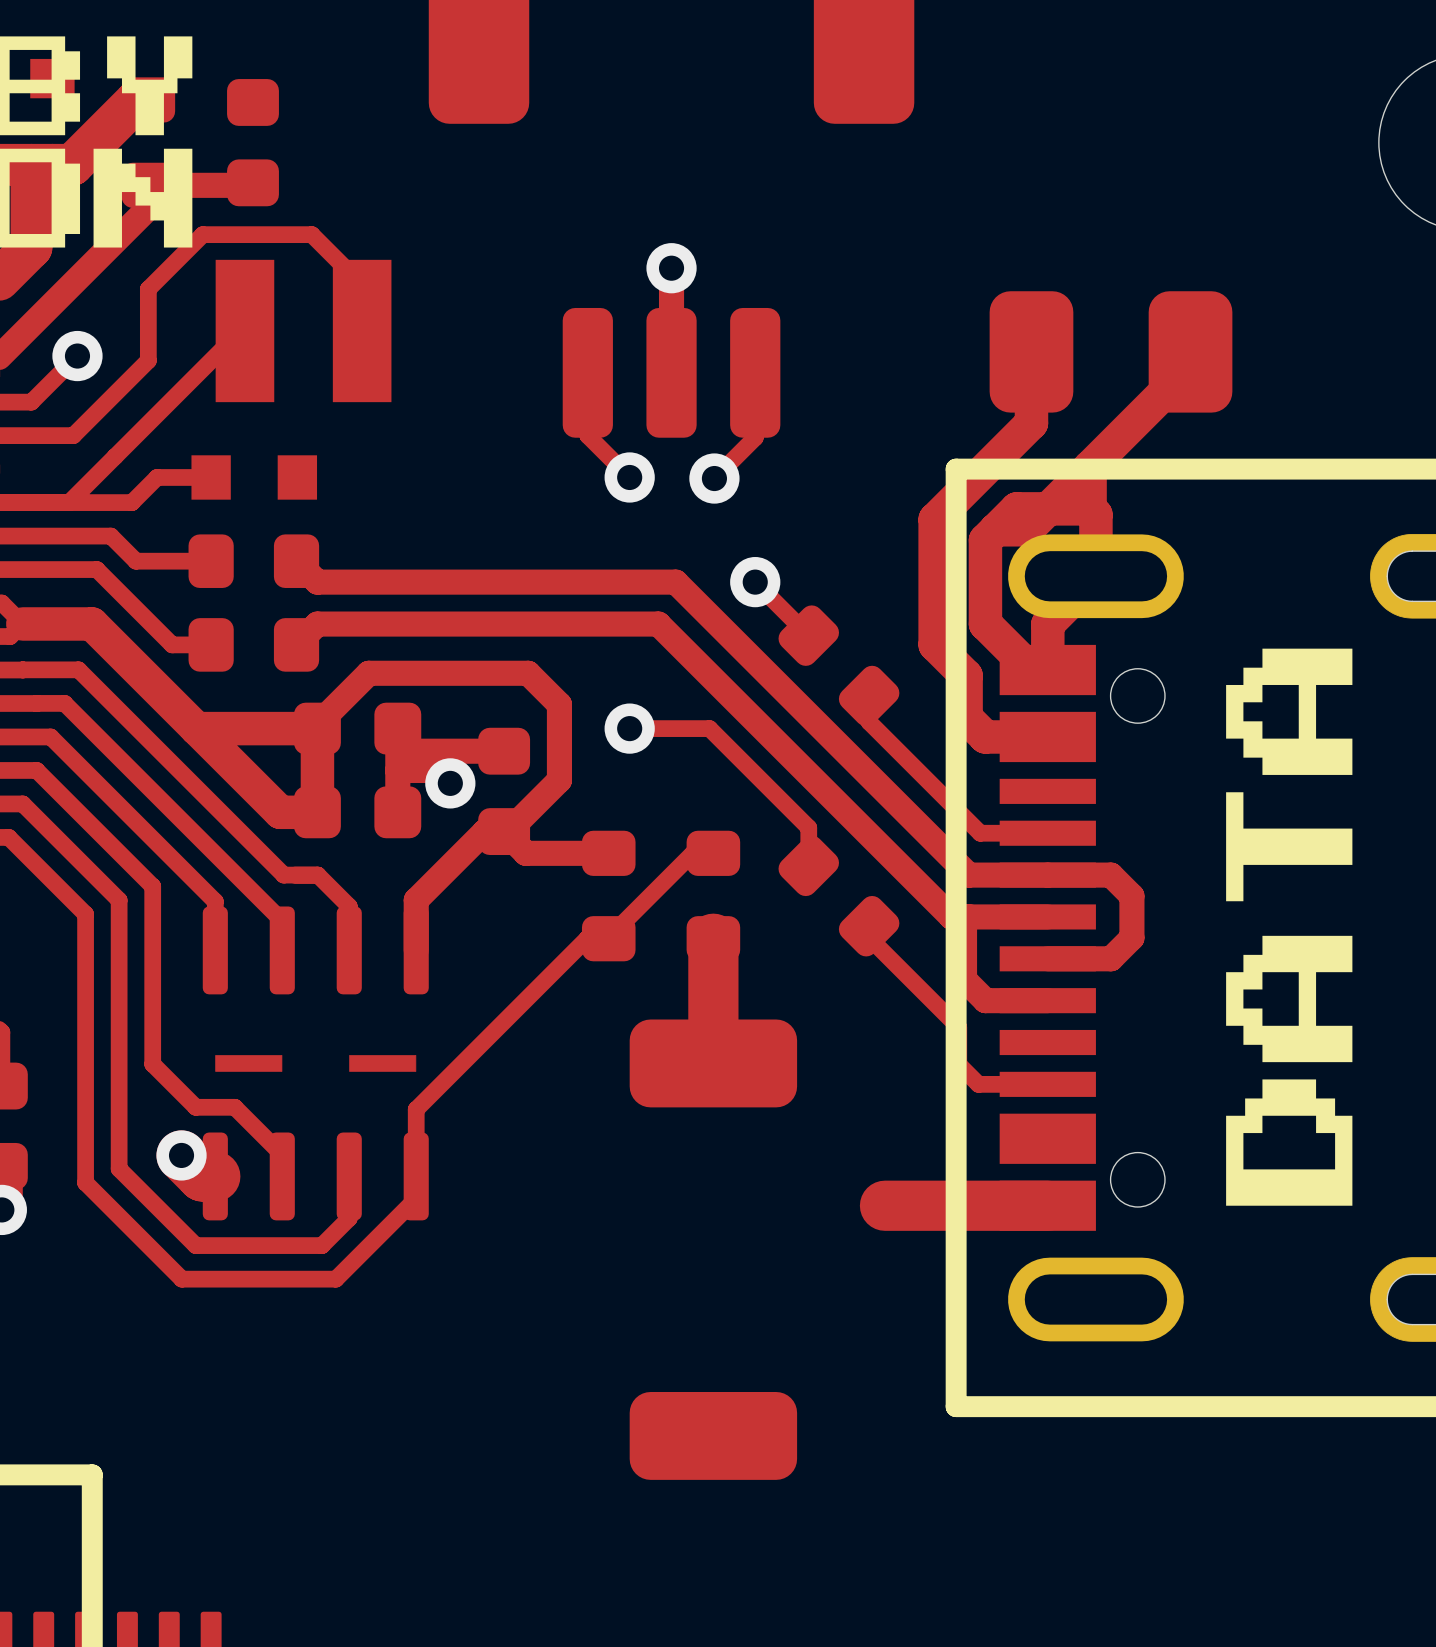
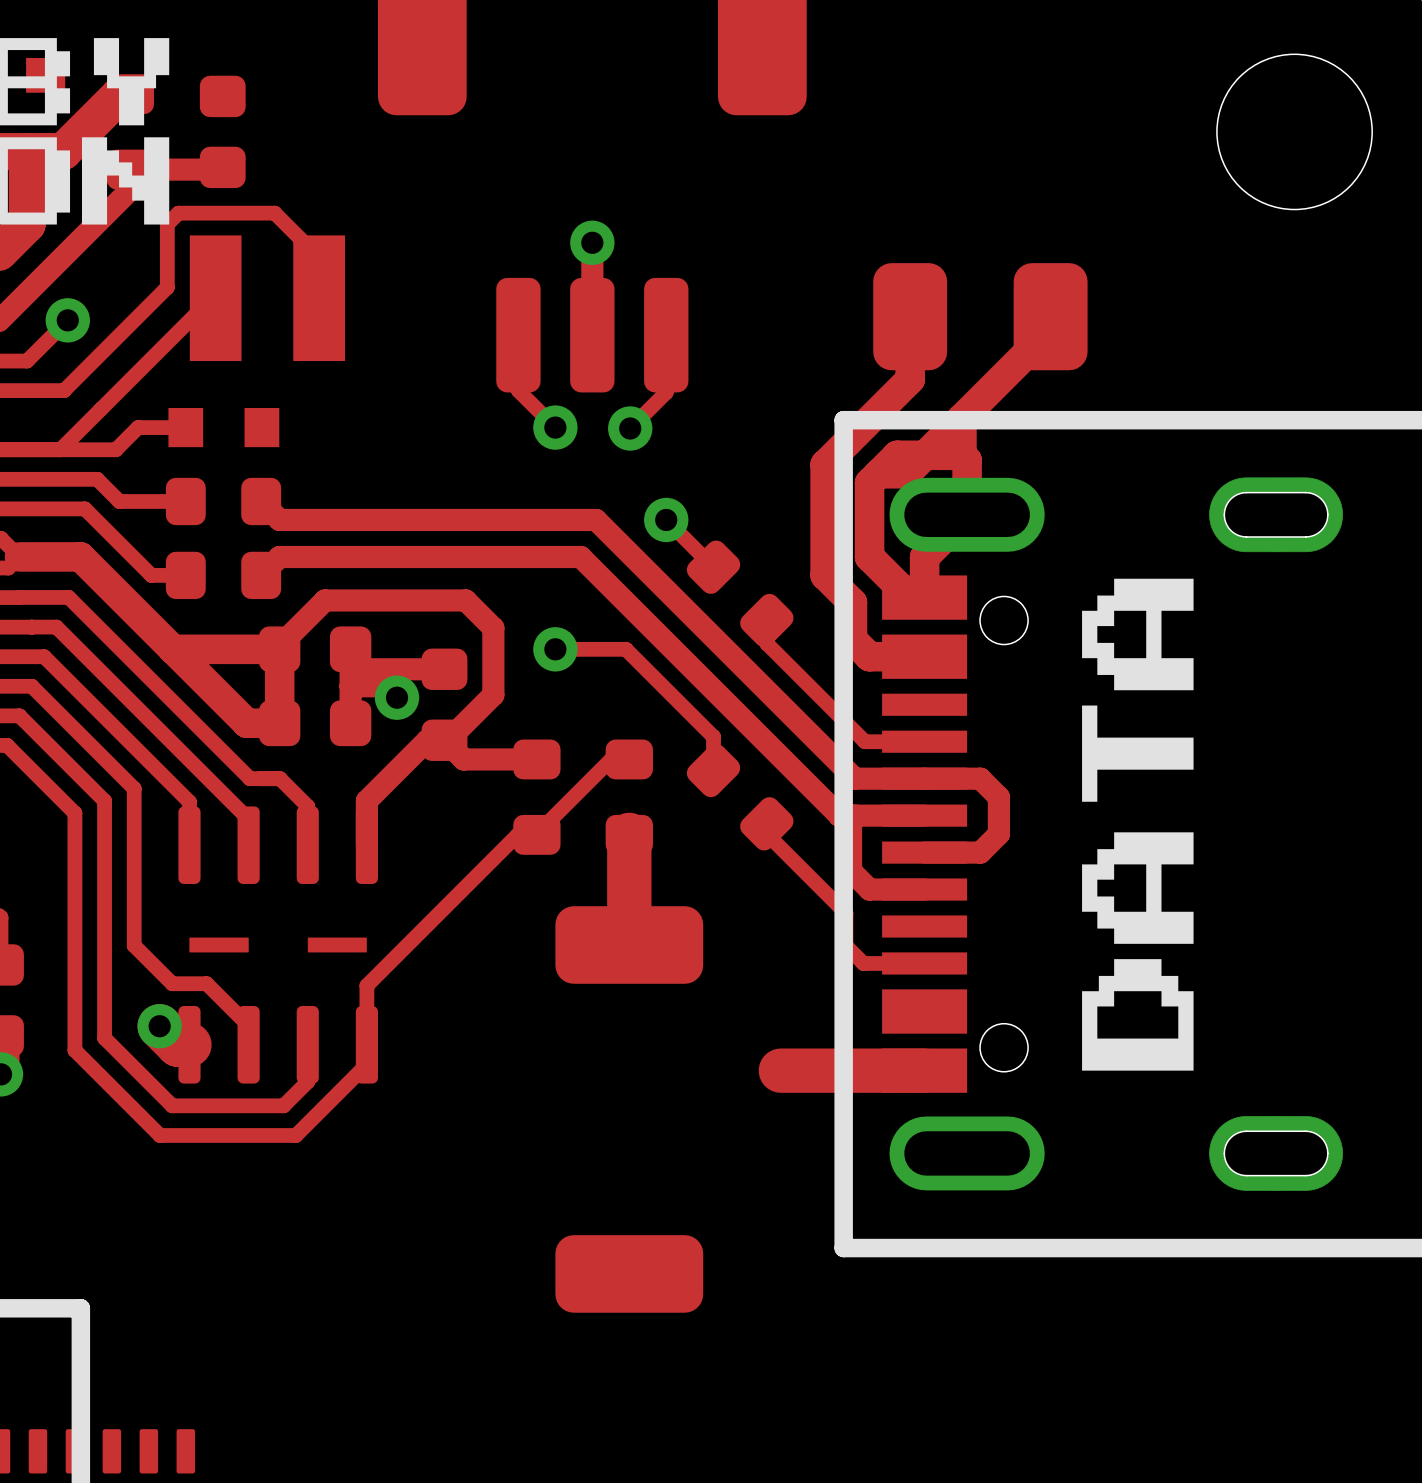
top track: (190, 247) (148, 289) (148, 360) -> (167, 224) (167, 287) (130, 324)

